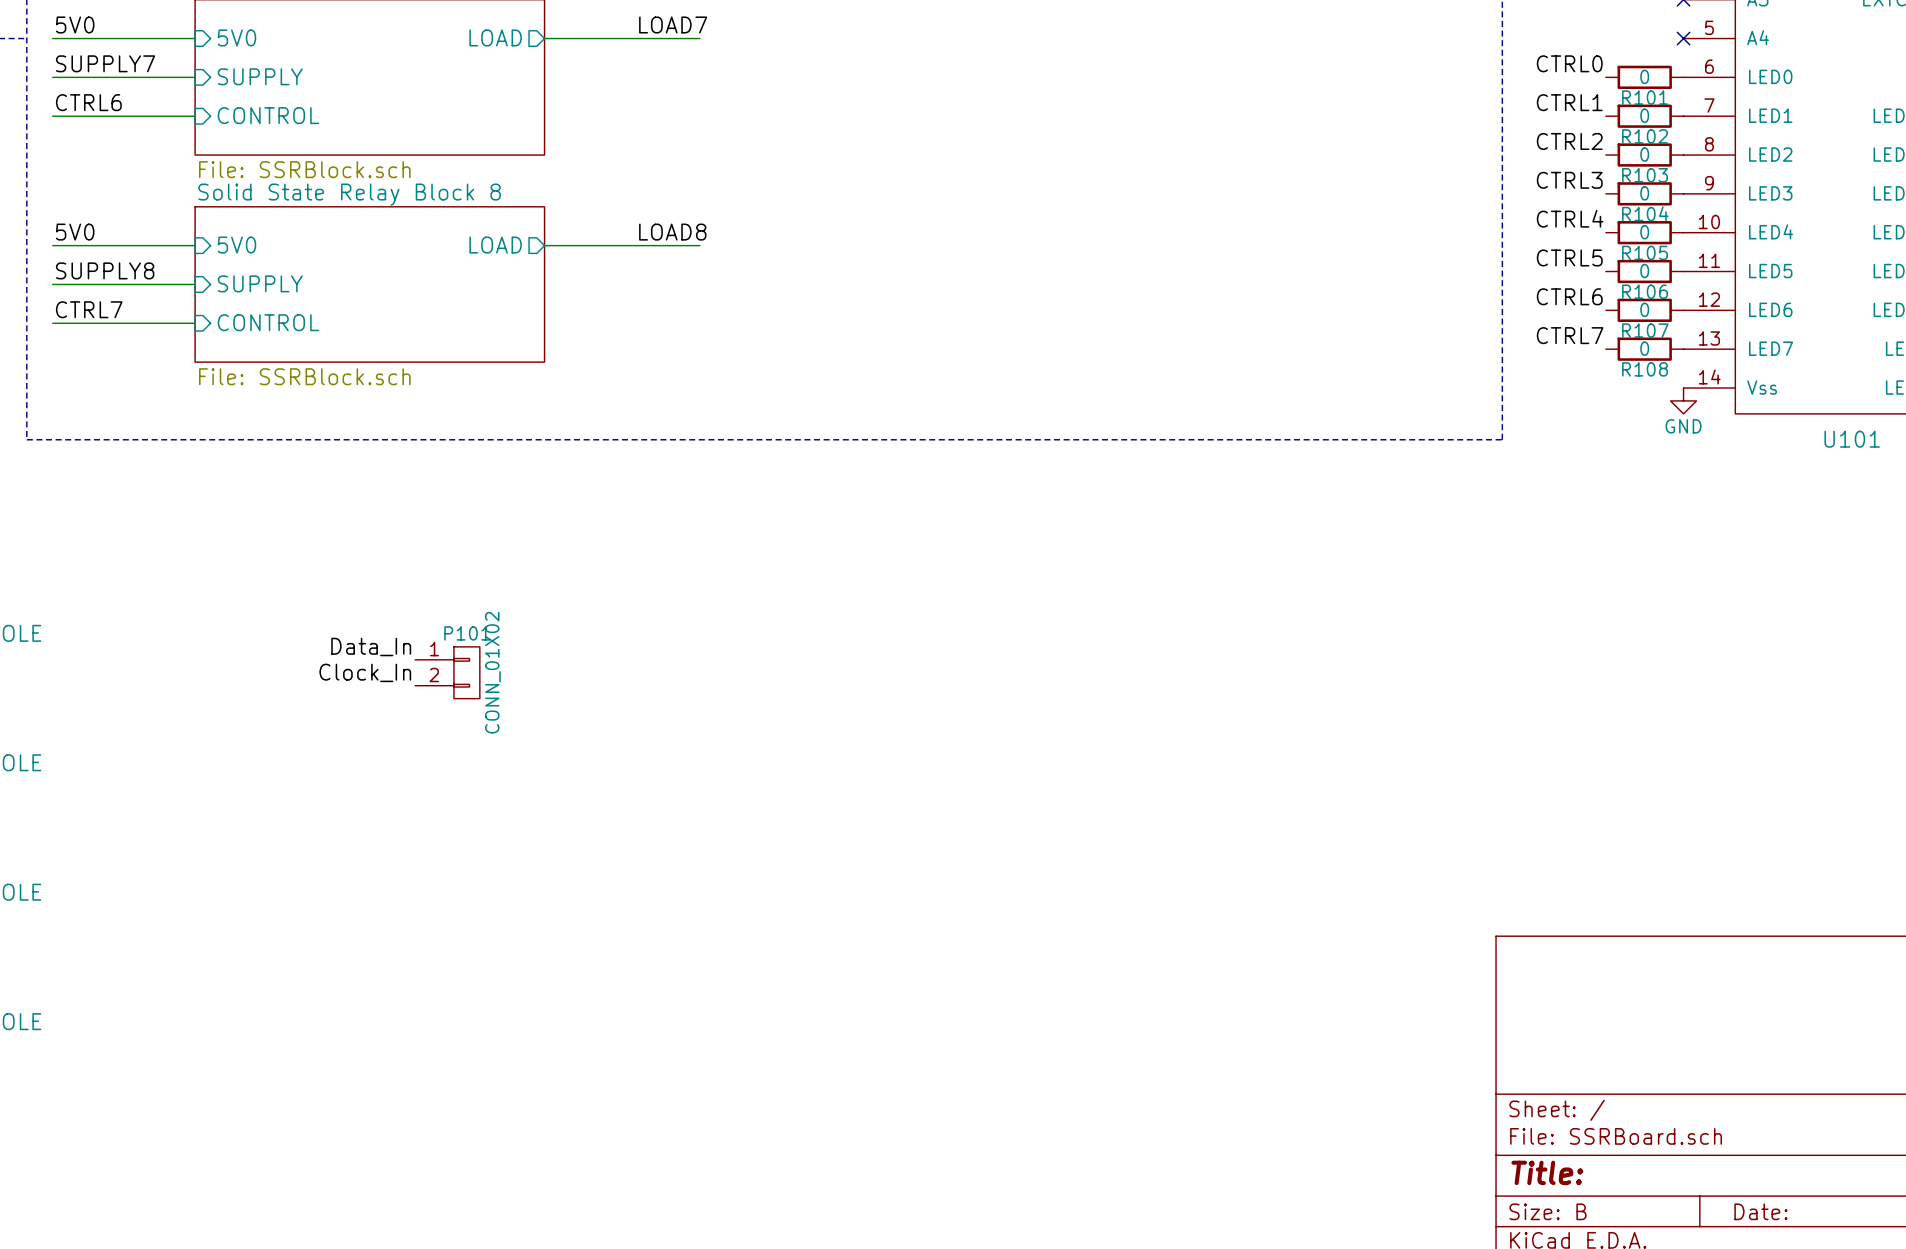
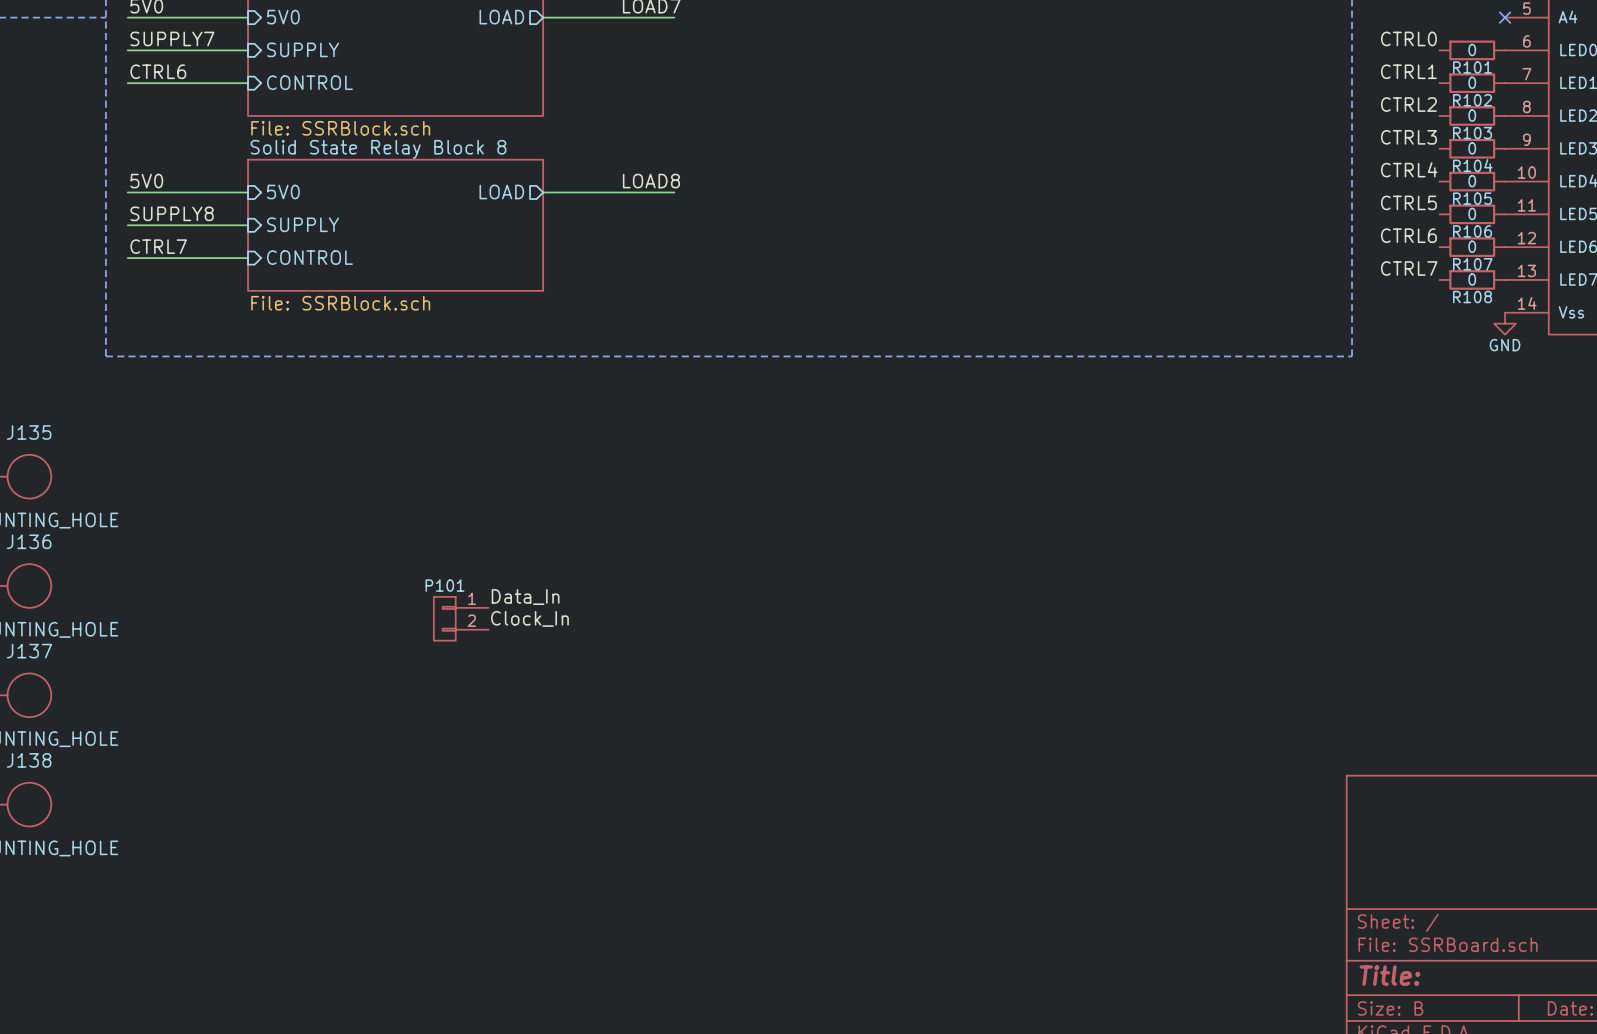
label position: Data_In (371, 647) -> Data_In (525, 597)
label position: Clock_In (365, 672) -> Clock_In (529, 618)
P101 position: (447, 672) -> (461, 618)
P101 flip: as is (466, 672) -> left-right (444, 618)
P101 value: CONN_01X02 (492, 672) -> none

